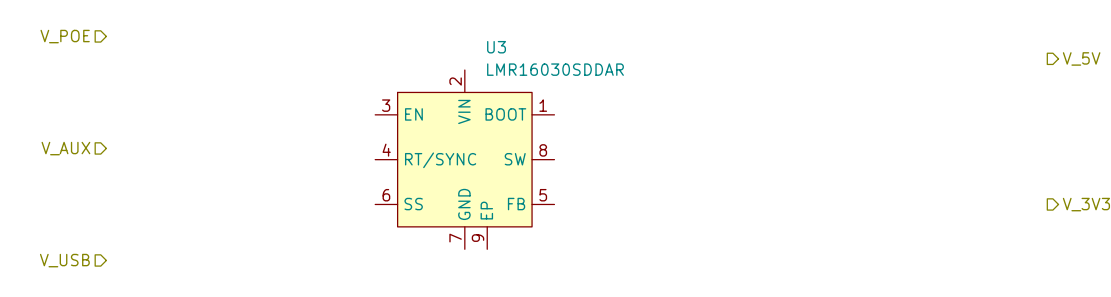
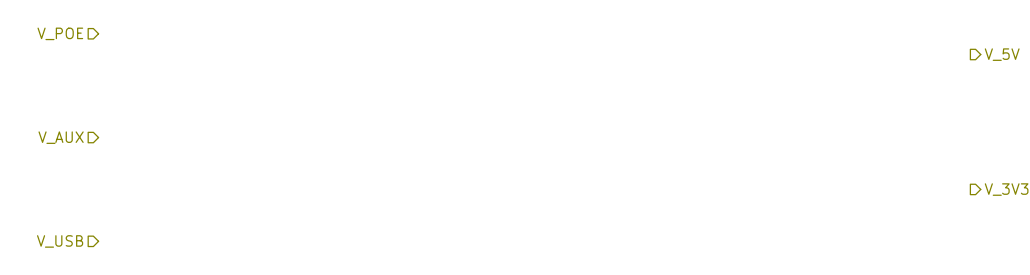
U3: LMR16030SDDAR (464, 159) -> none

